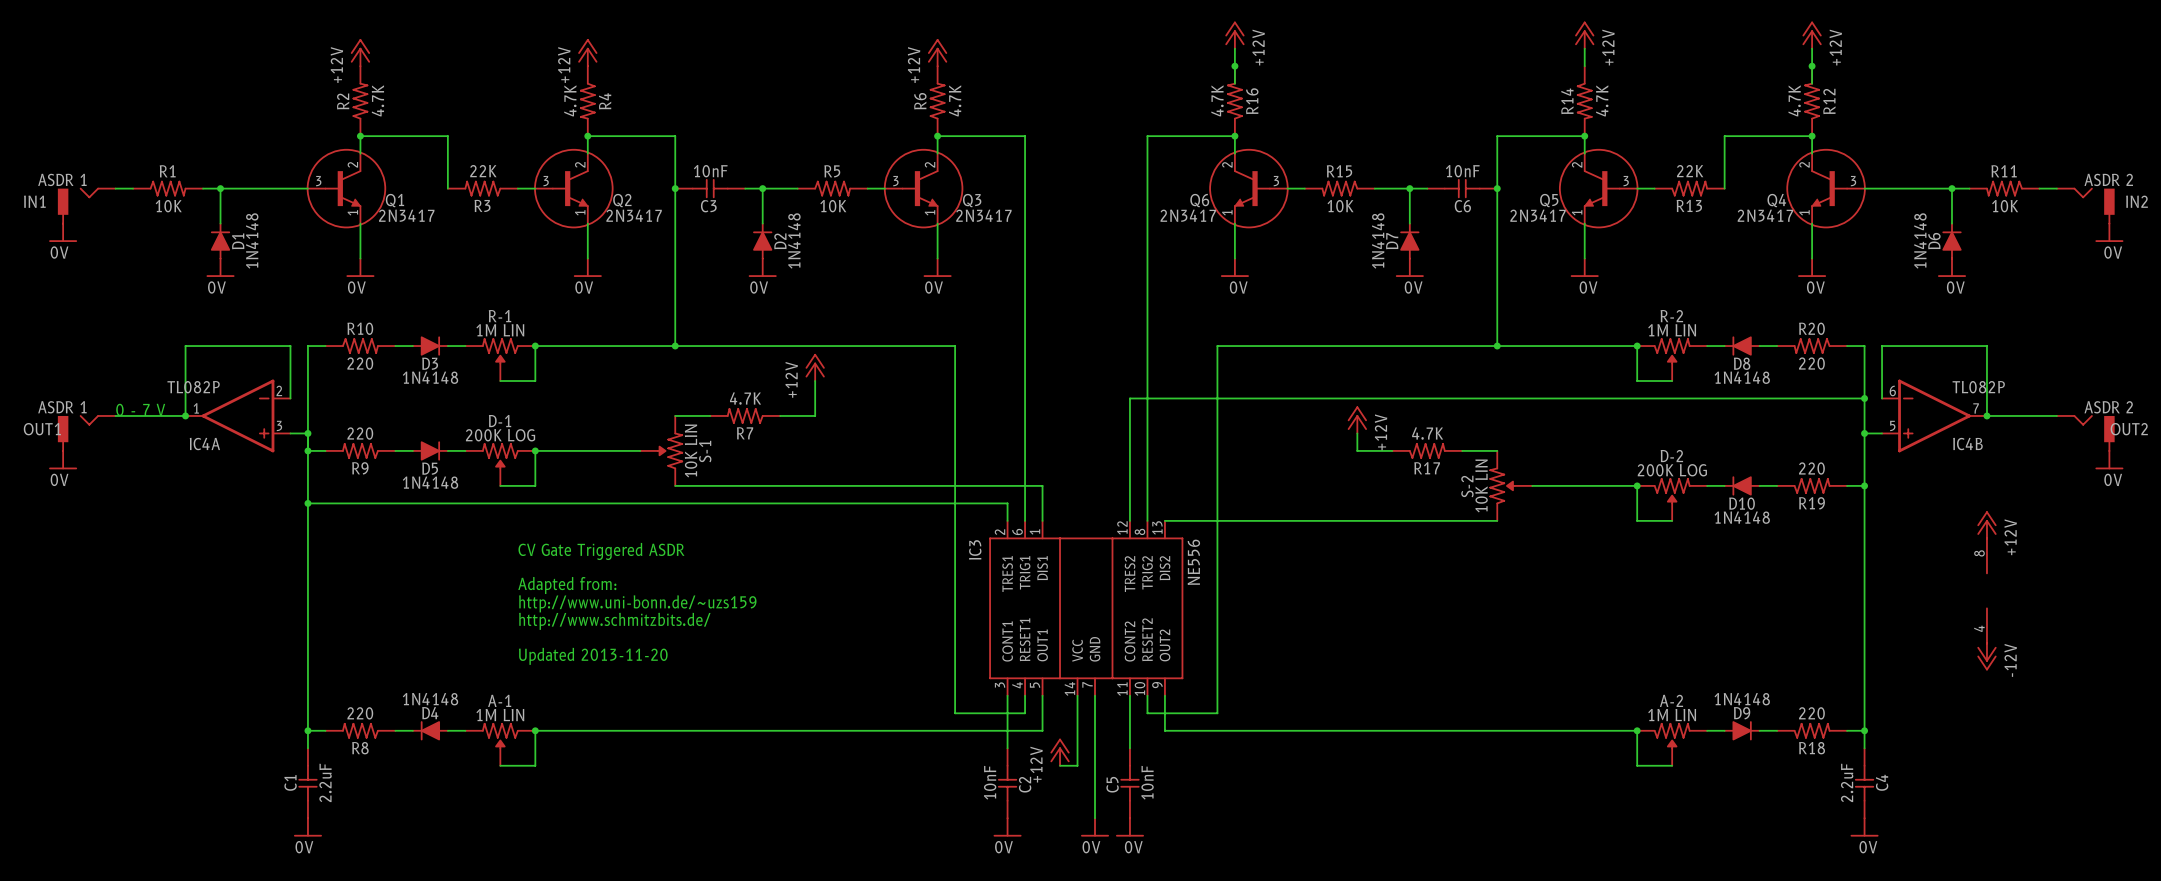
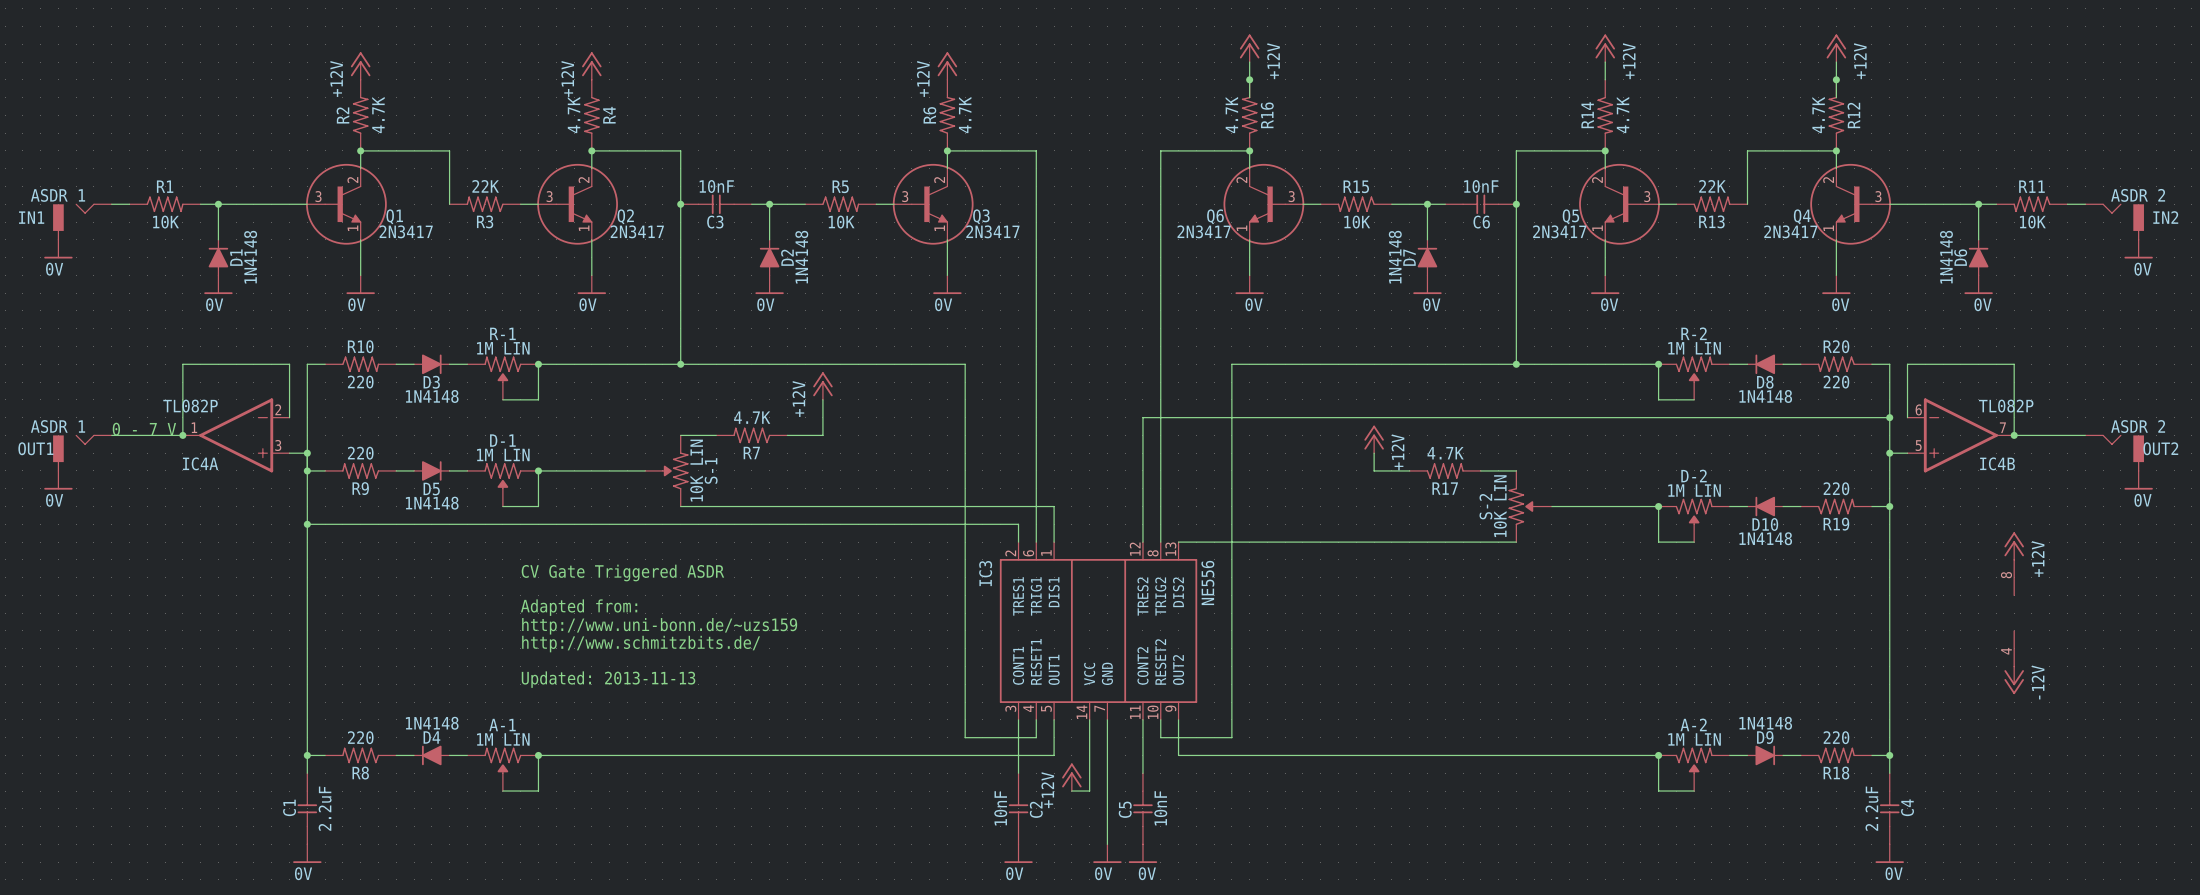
D-1 value: 200K LOG (500, 435) -> 1M LIN (503, 454)
D-2 value: 200K LOG (1672, 470) -> 1M LIN (1694, 490)
text: Updated 2013-11-20 (593, 656) -> Updated: 2013-11-13 (608, 679)

